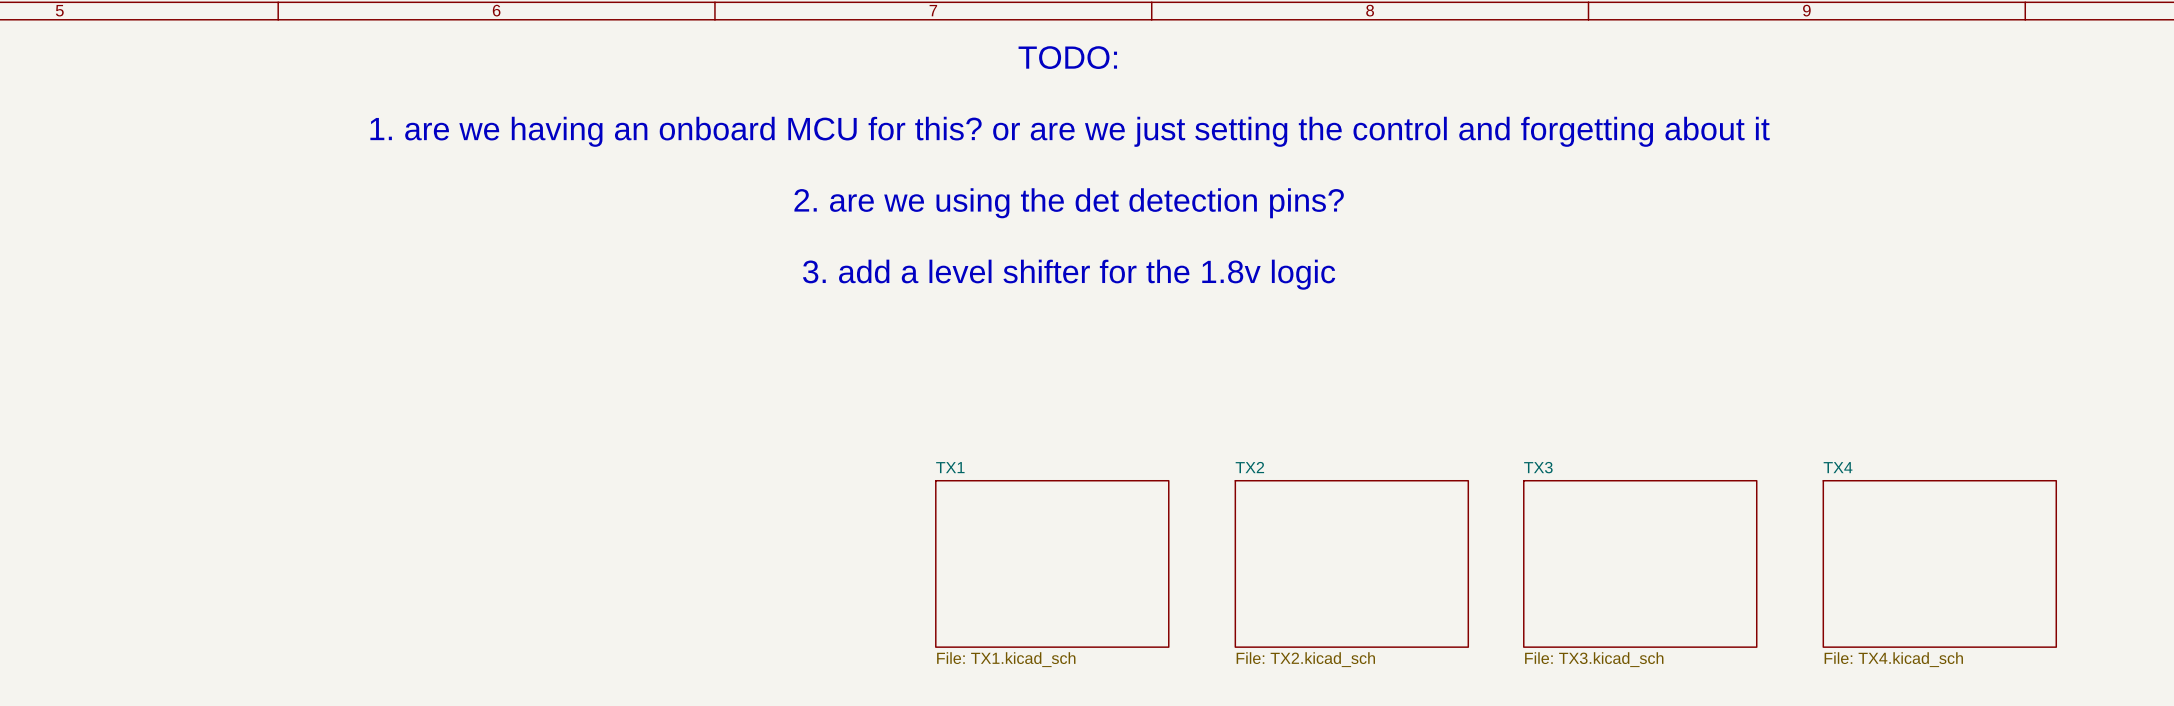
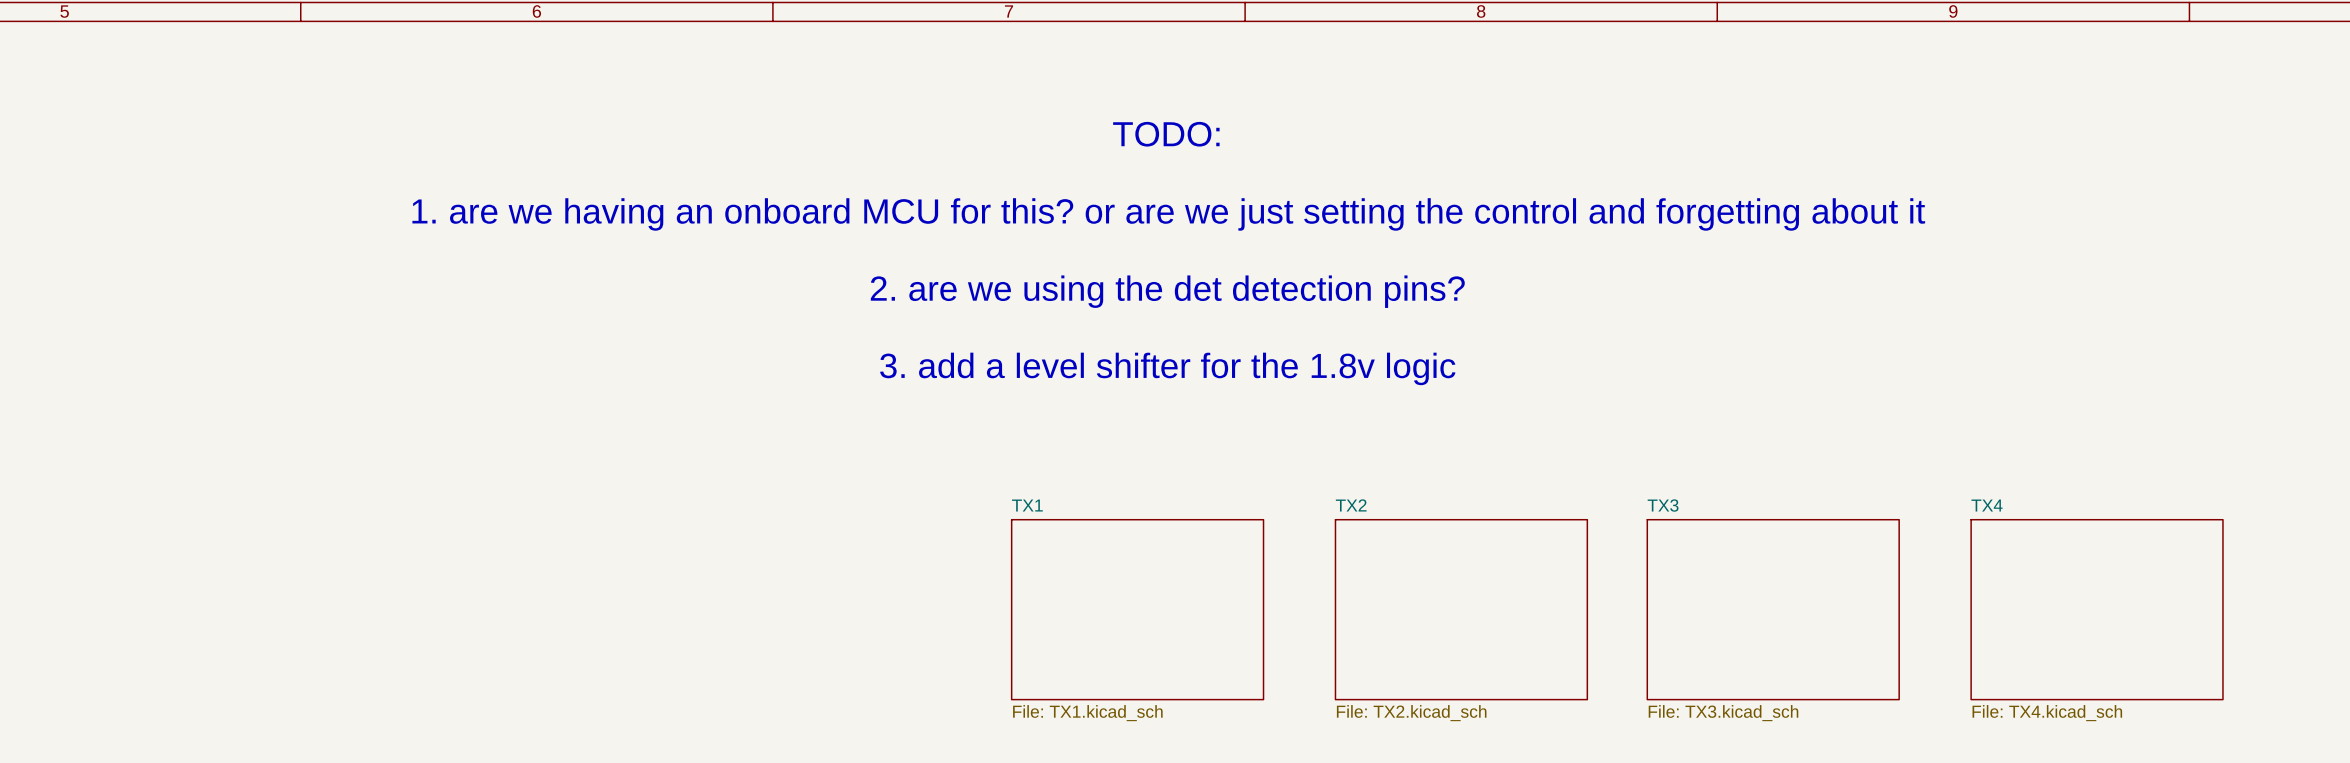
text position: TODO: (1067, 57) -> TODO: (1166, 134)
text position: 1. are we having an onboard MCU for this? or are we just setting the control and forgetting about it (1070, 131) -> 1. are we having an onboard MCU for this? or are we just setting the control and forgetting about it (1168, 214)
text position: 2. are we using the det detection pins? (1069, 203) -> 2. are we using the det detection pins? (1167, 291)
text position: 3. add a level shifter for the 1.8v logic (1069, 274) -> 3. add a level shifter for the 1.8v logic (1167, 368)

